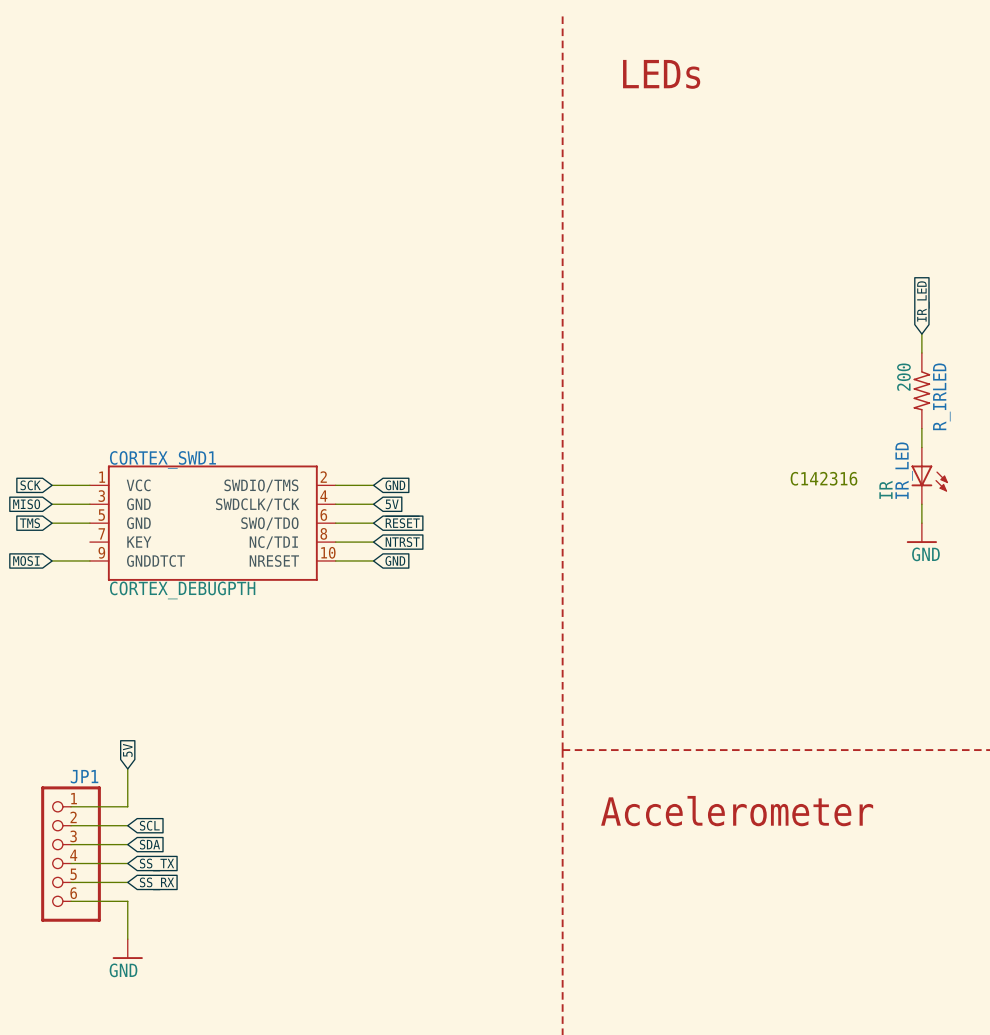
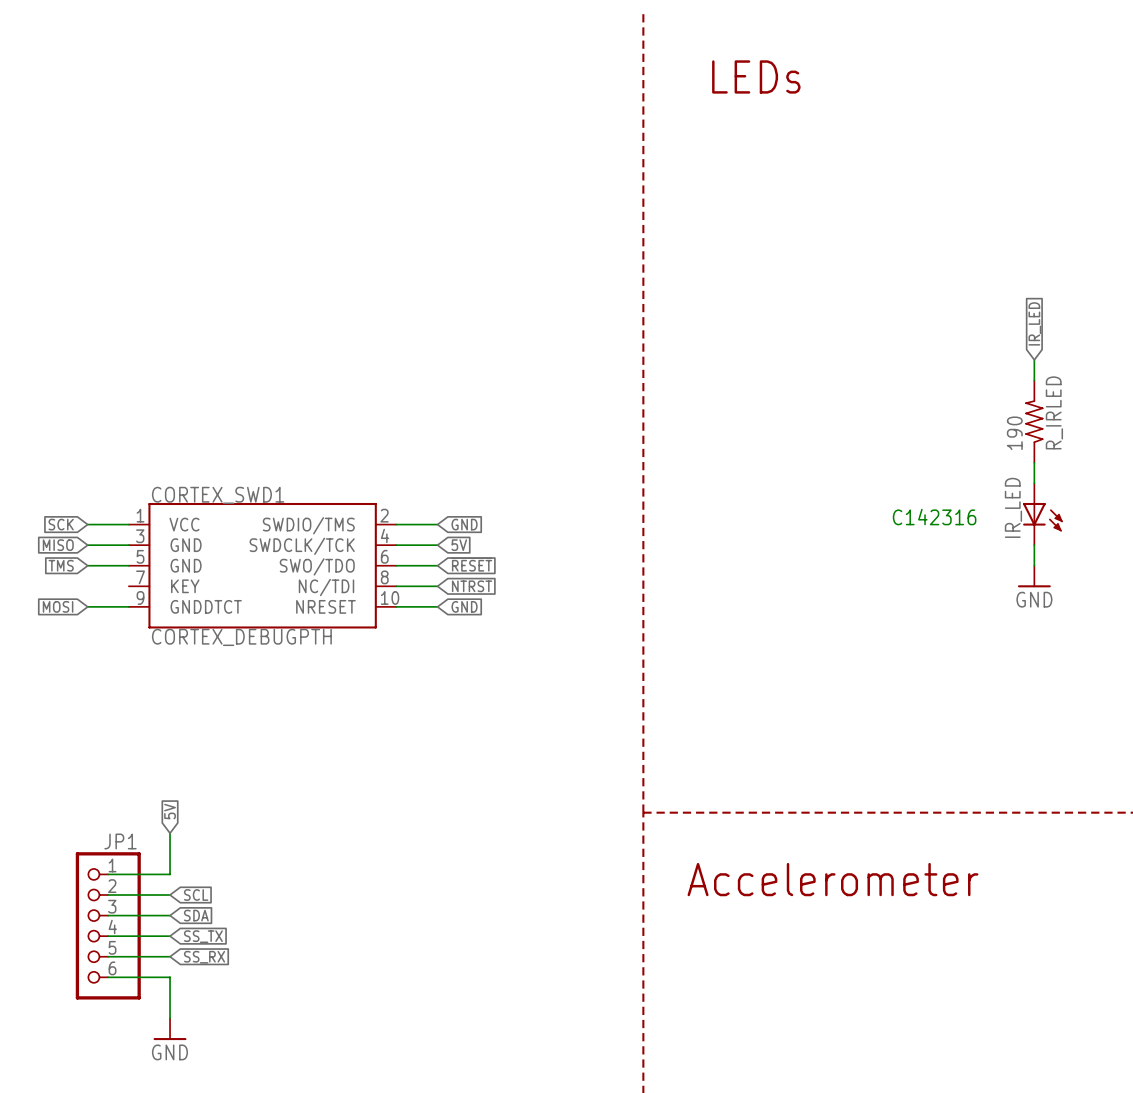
R_IRLED value: 200 (903, 377) -> 190 (1014, 433)
R_IRLED flip: as is (921, 390) -> up-down (1034, 421)
IR_LED value: IR (885, 489) -> none

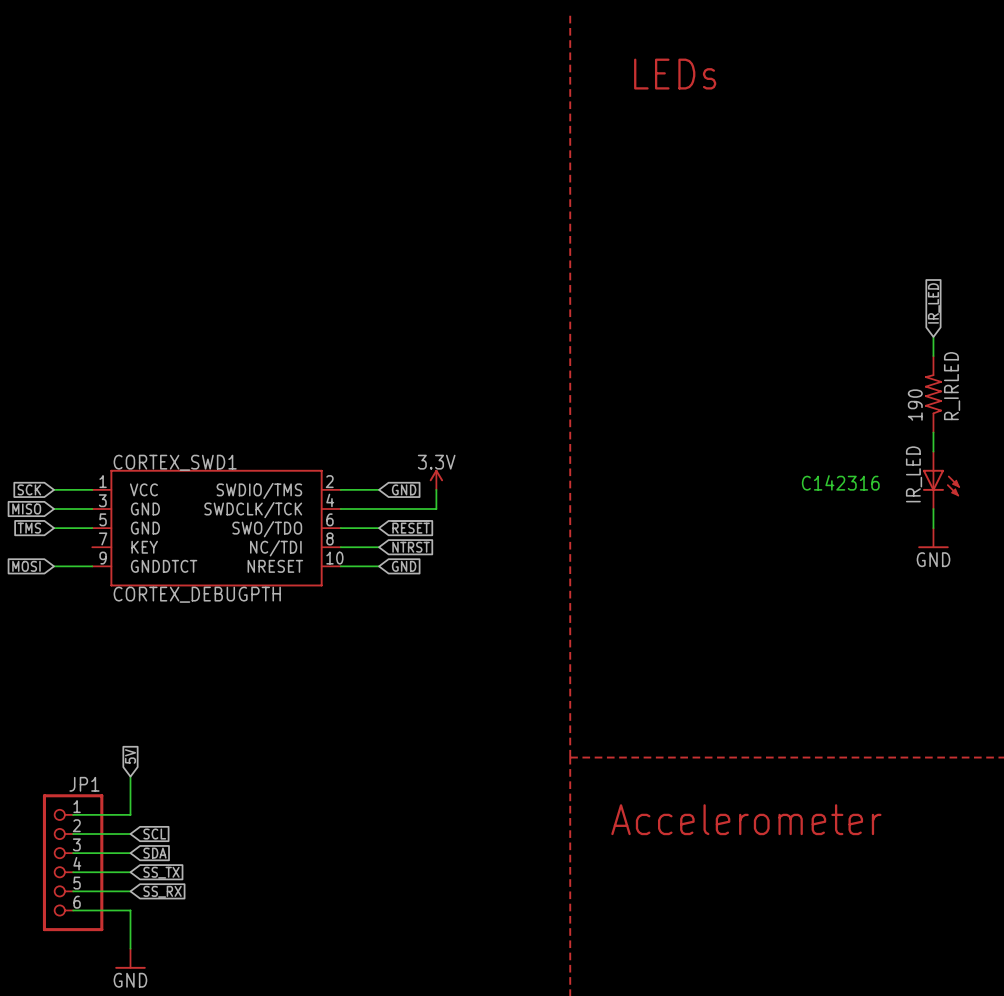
power symbol: none -> 3.3V (436, 479)
wire: none -> (436, 489) (436, 509) (379, 509)
global label: 5V (459, 545) -> none

